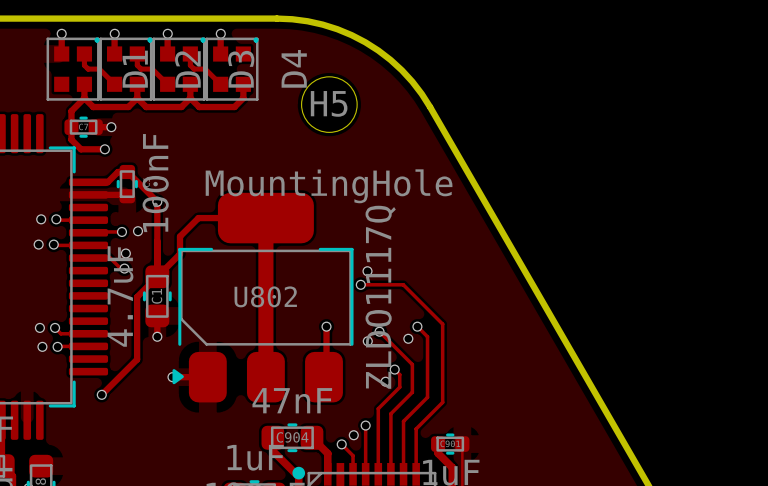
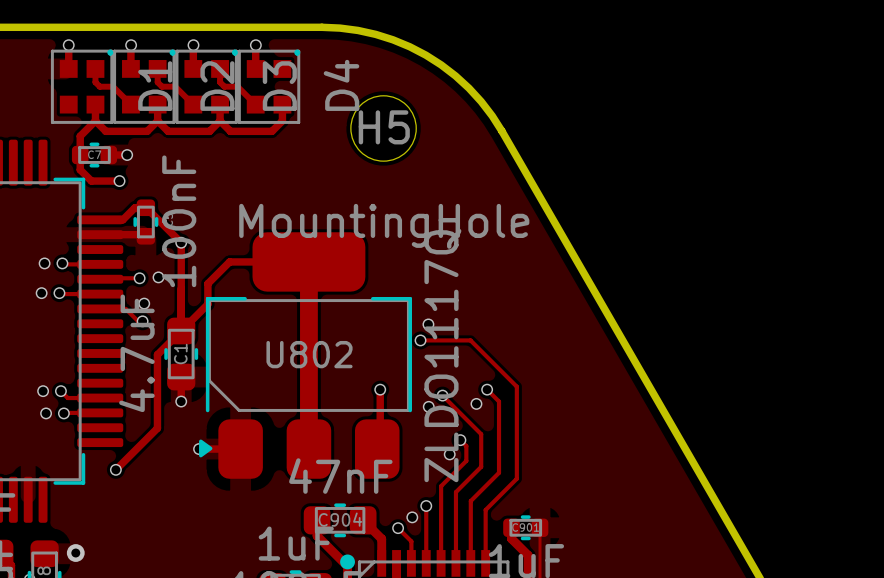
via: none -> (75, 553)

